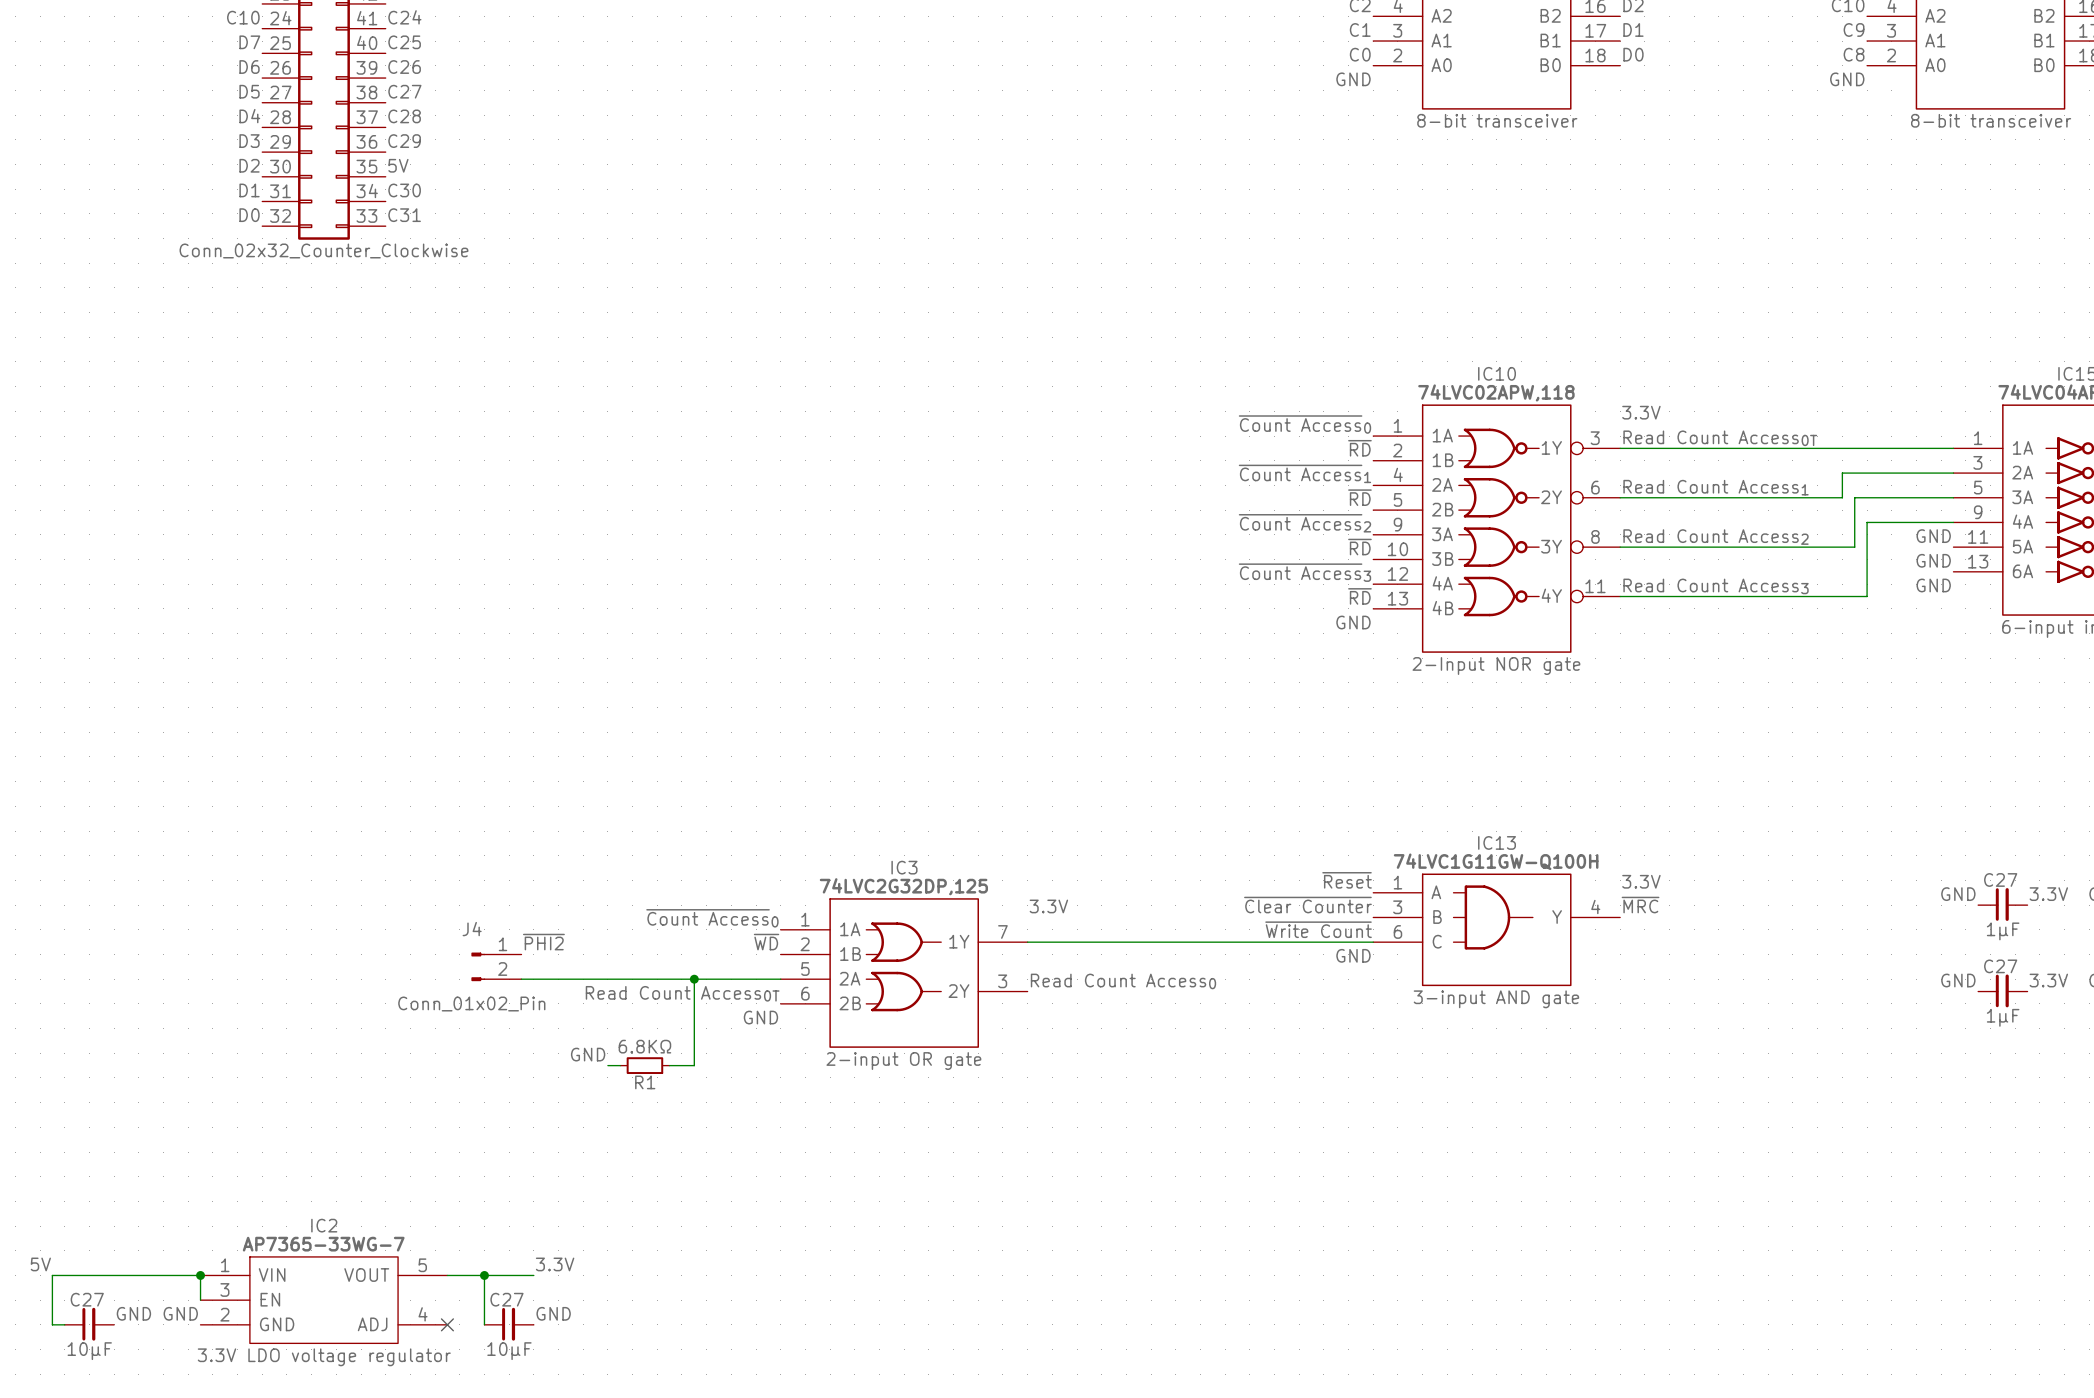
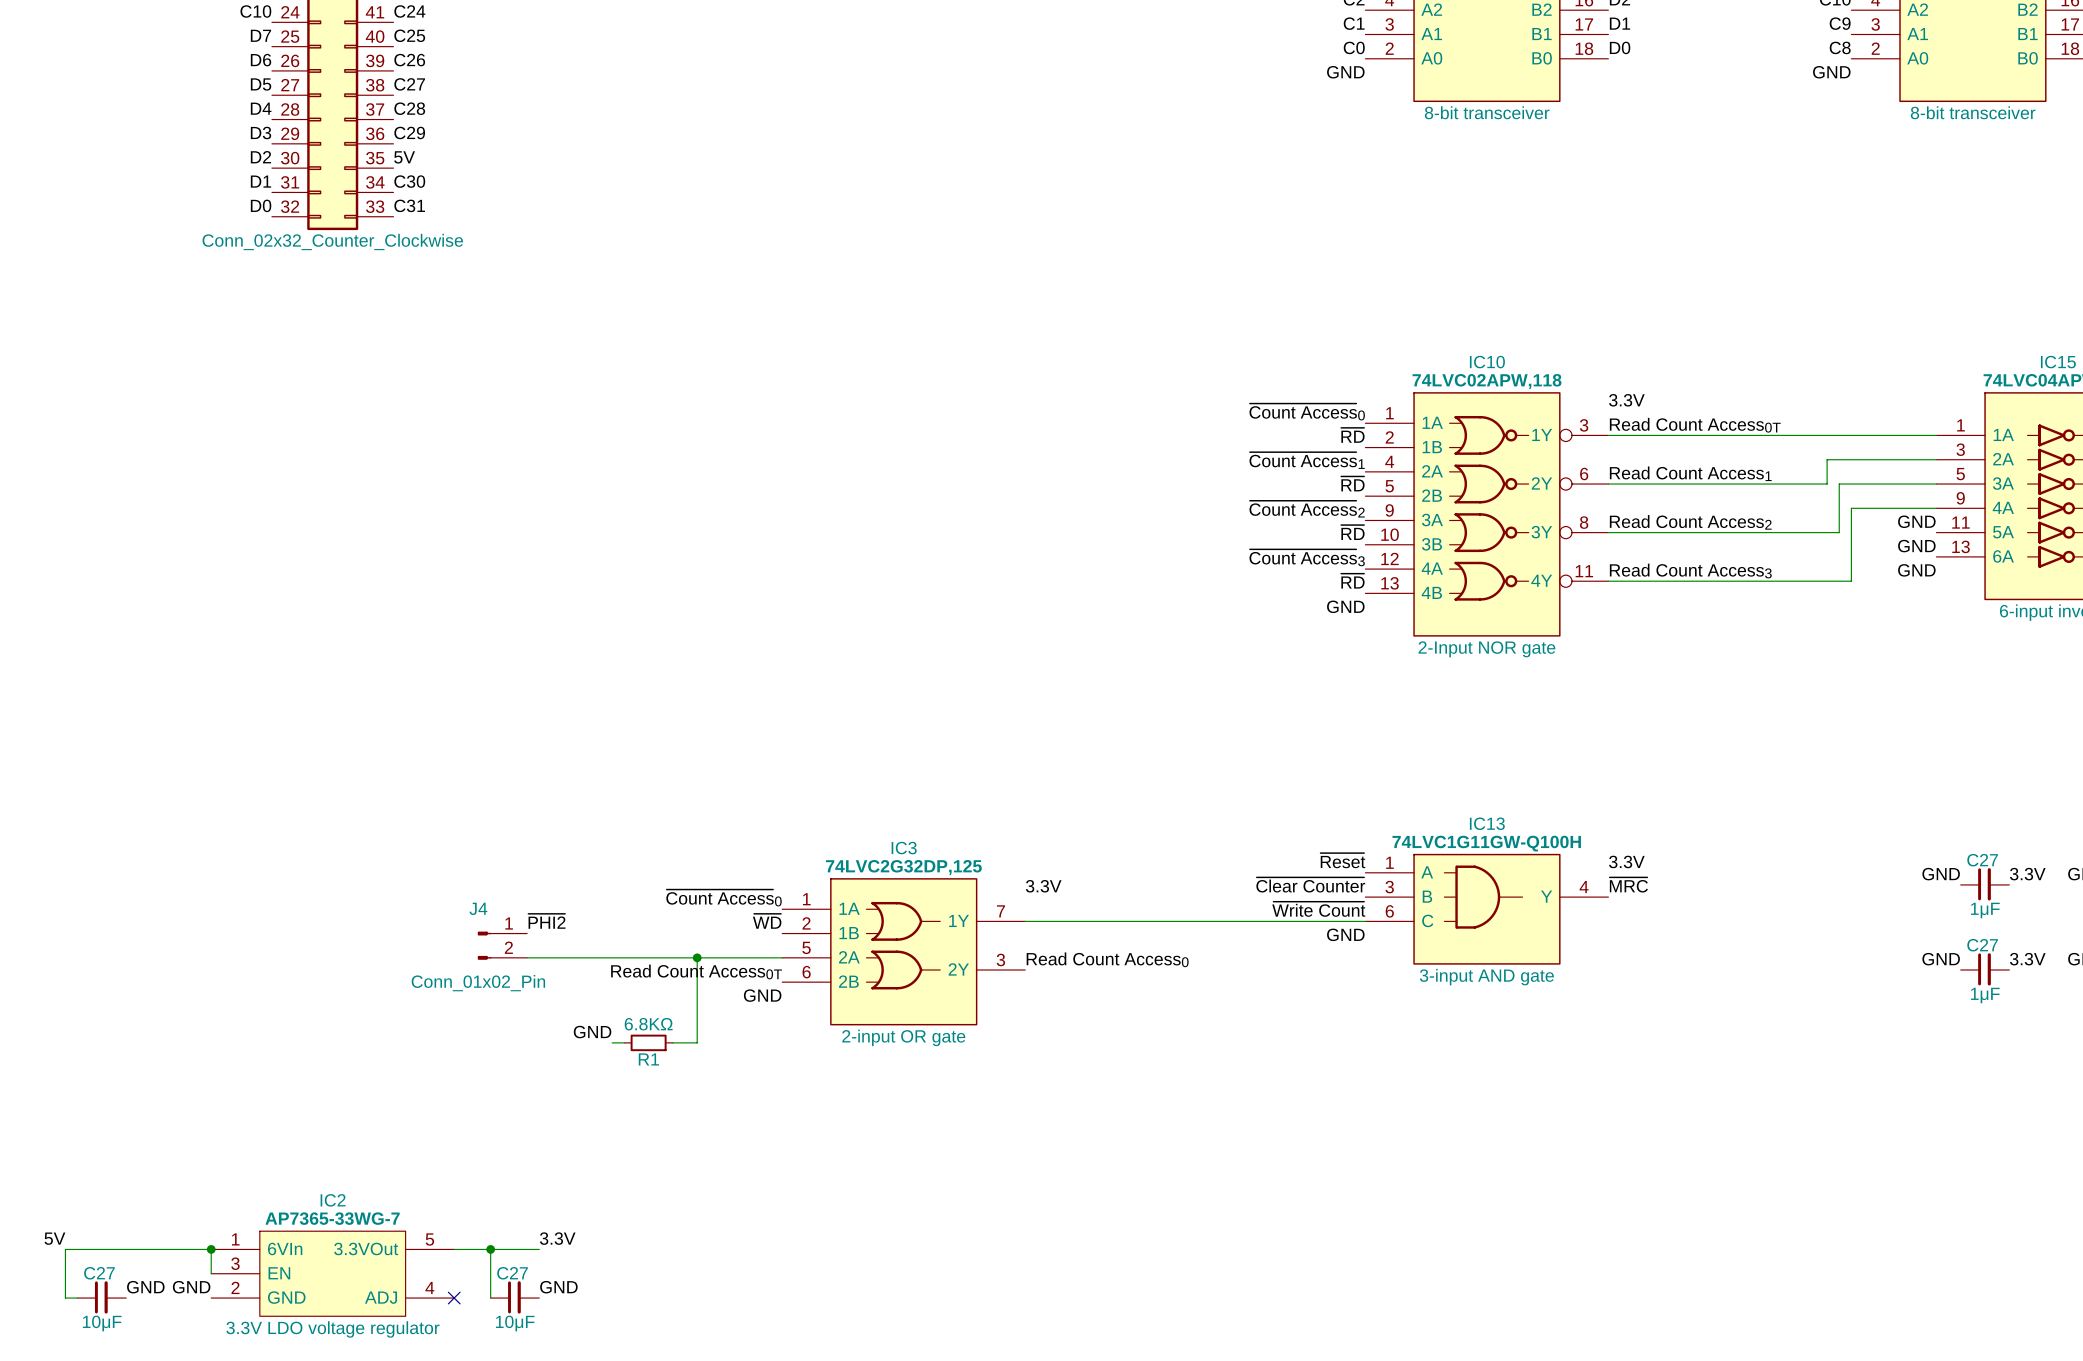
IC2 pin name: VIN (272, 1275) -> 6VIn (285, 1248)
IC2 pin name: VOUT (366, 1275) -> 3.3VOut (366, 1248)

